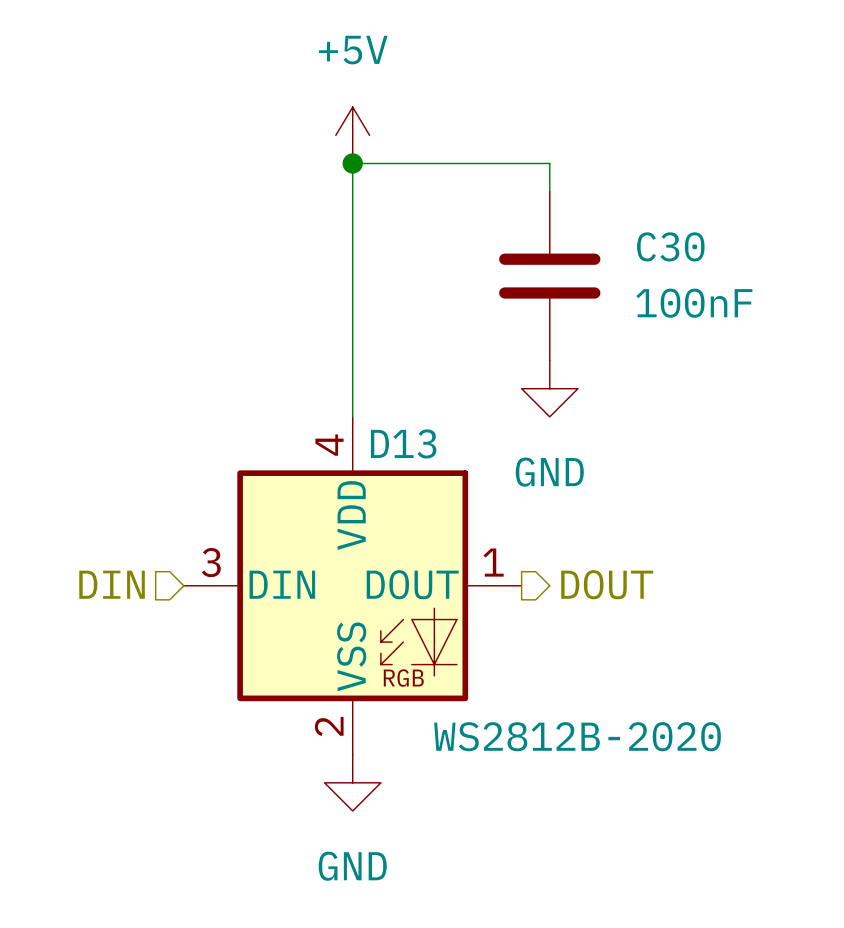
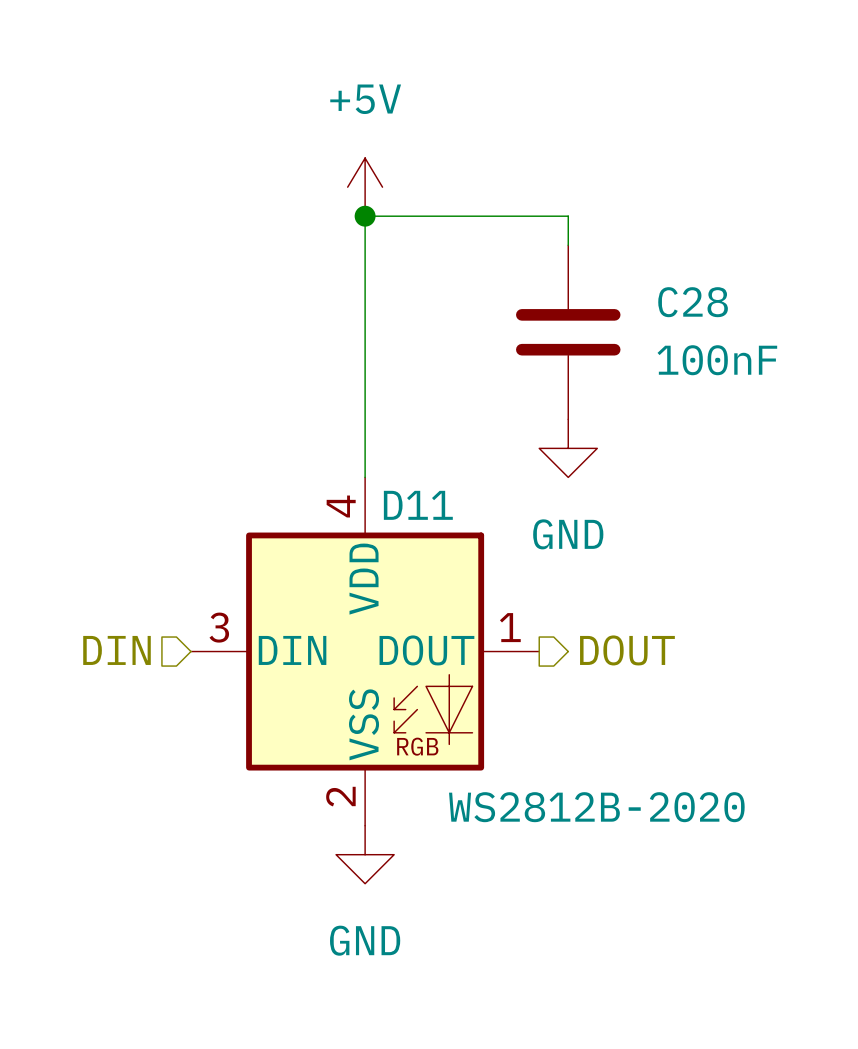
C30 name: C30 (670, 246) -> C28 (693, 302)
D13 name: D13 (403, 443) -> D11 (418, 505)

